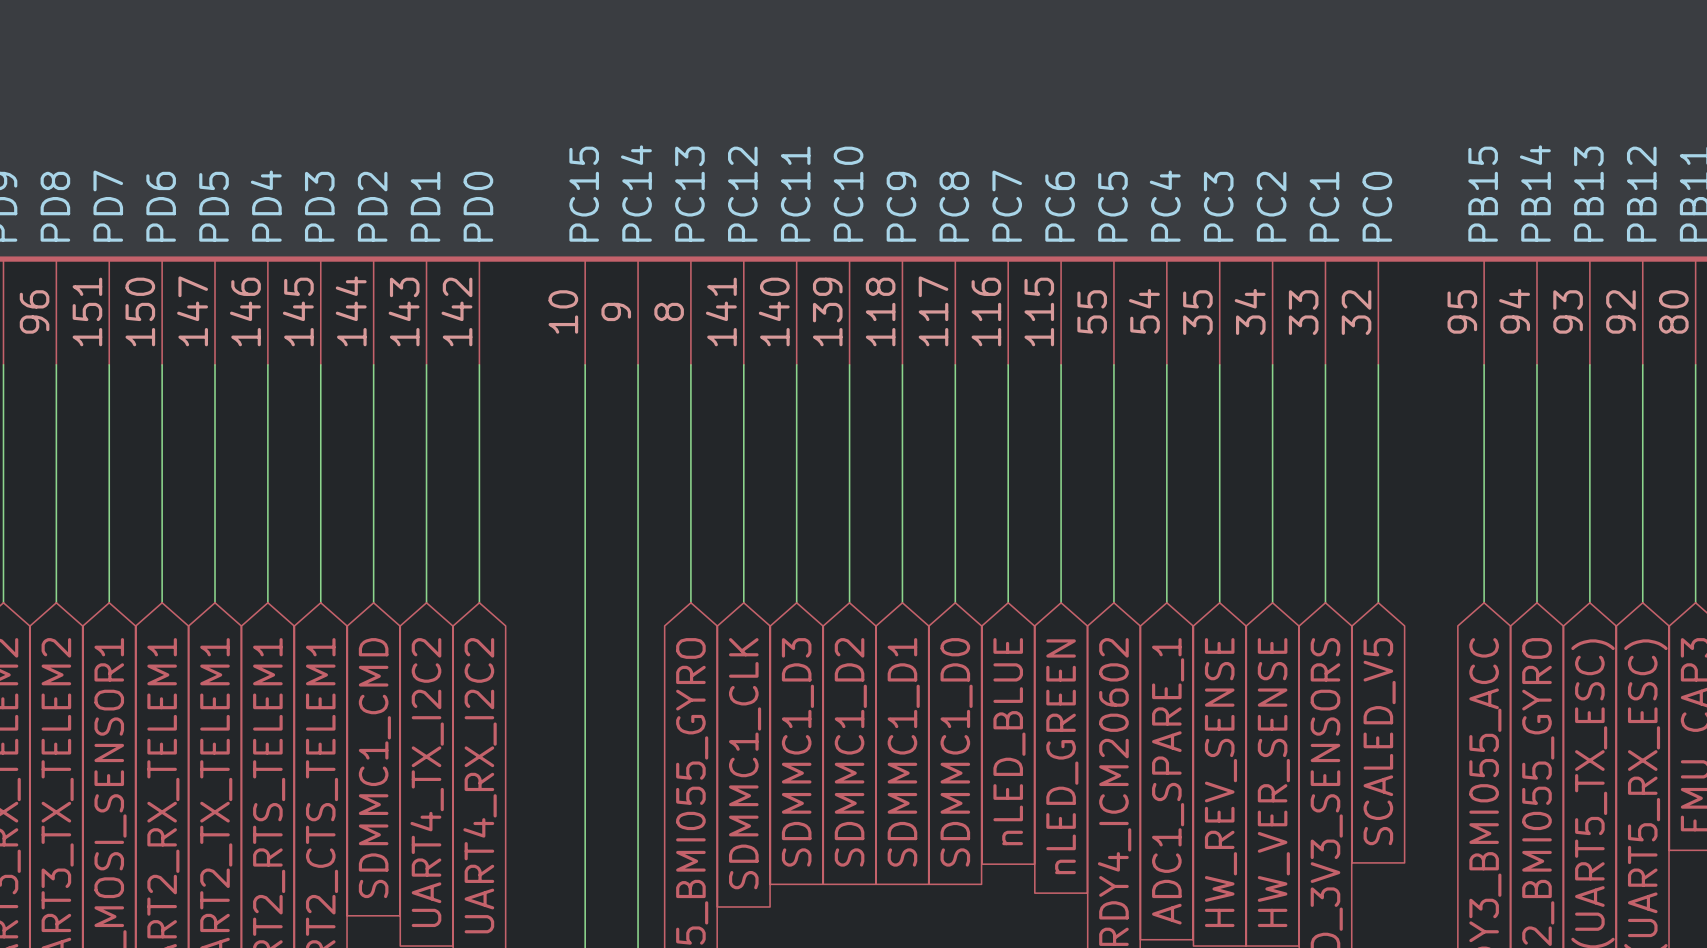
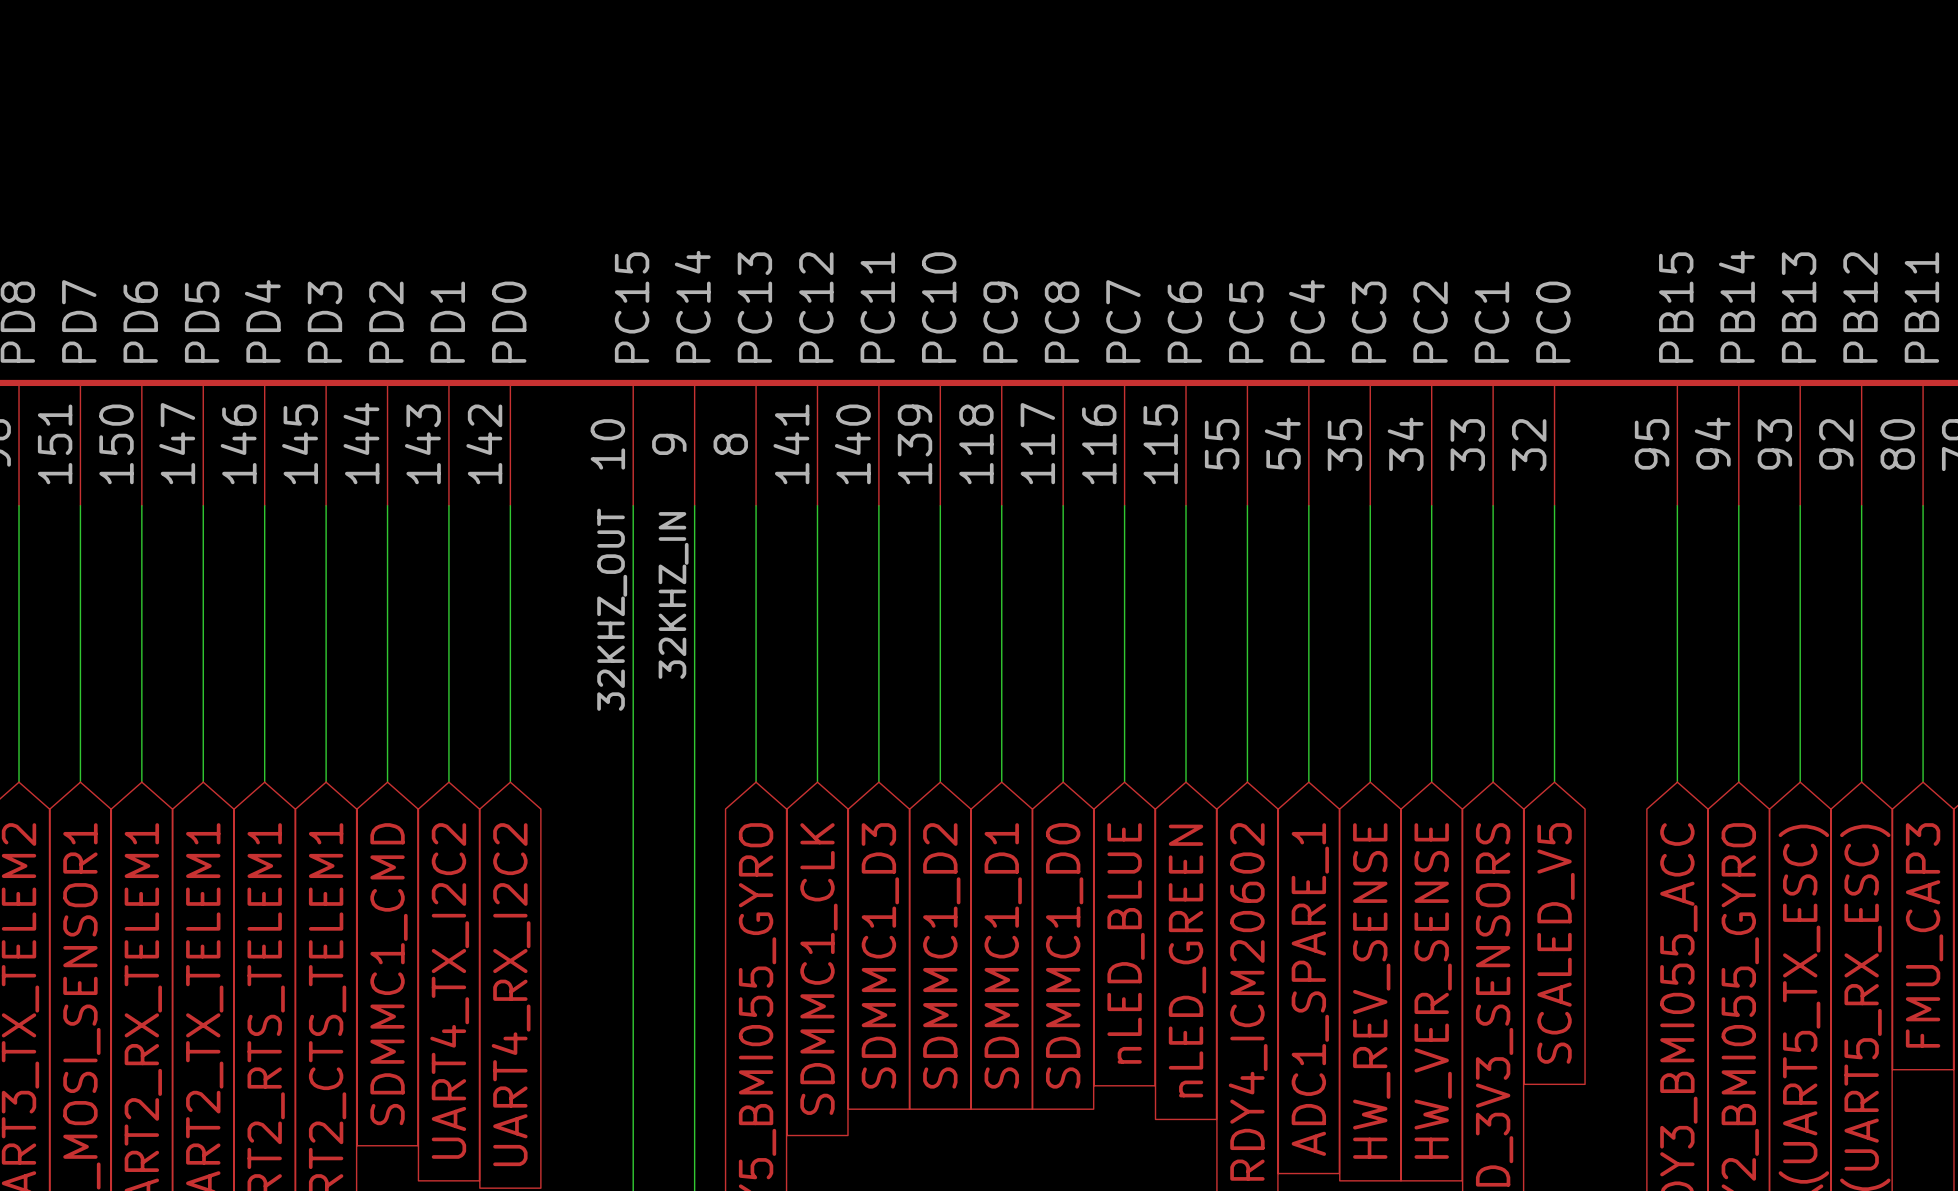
label: none -> 32KHZ_IN (673, 595)
label: none -> 32KHZ_OUT (612, 609)

